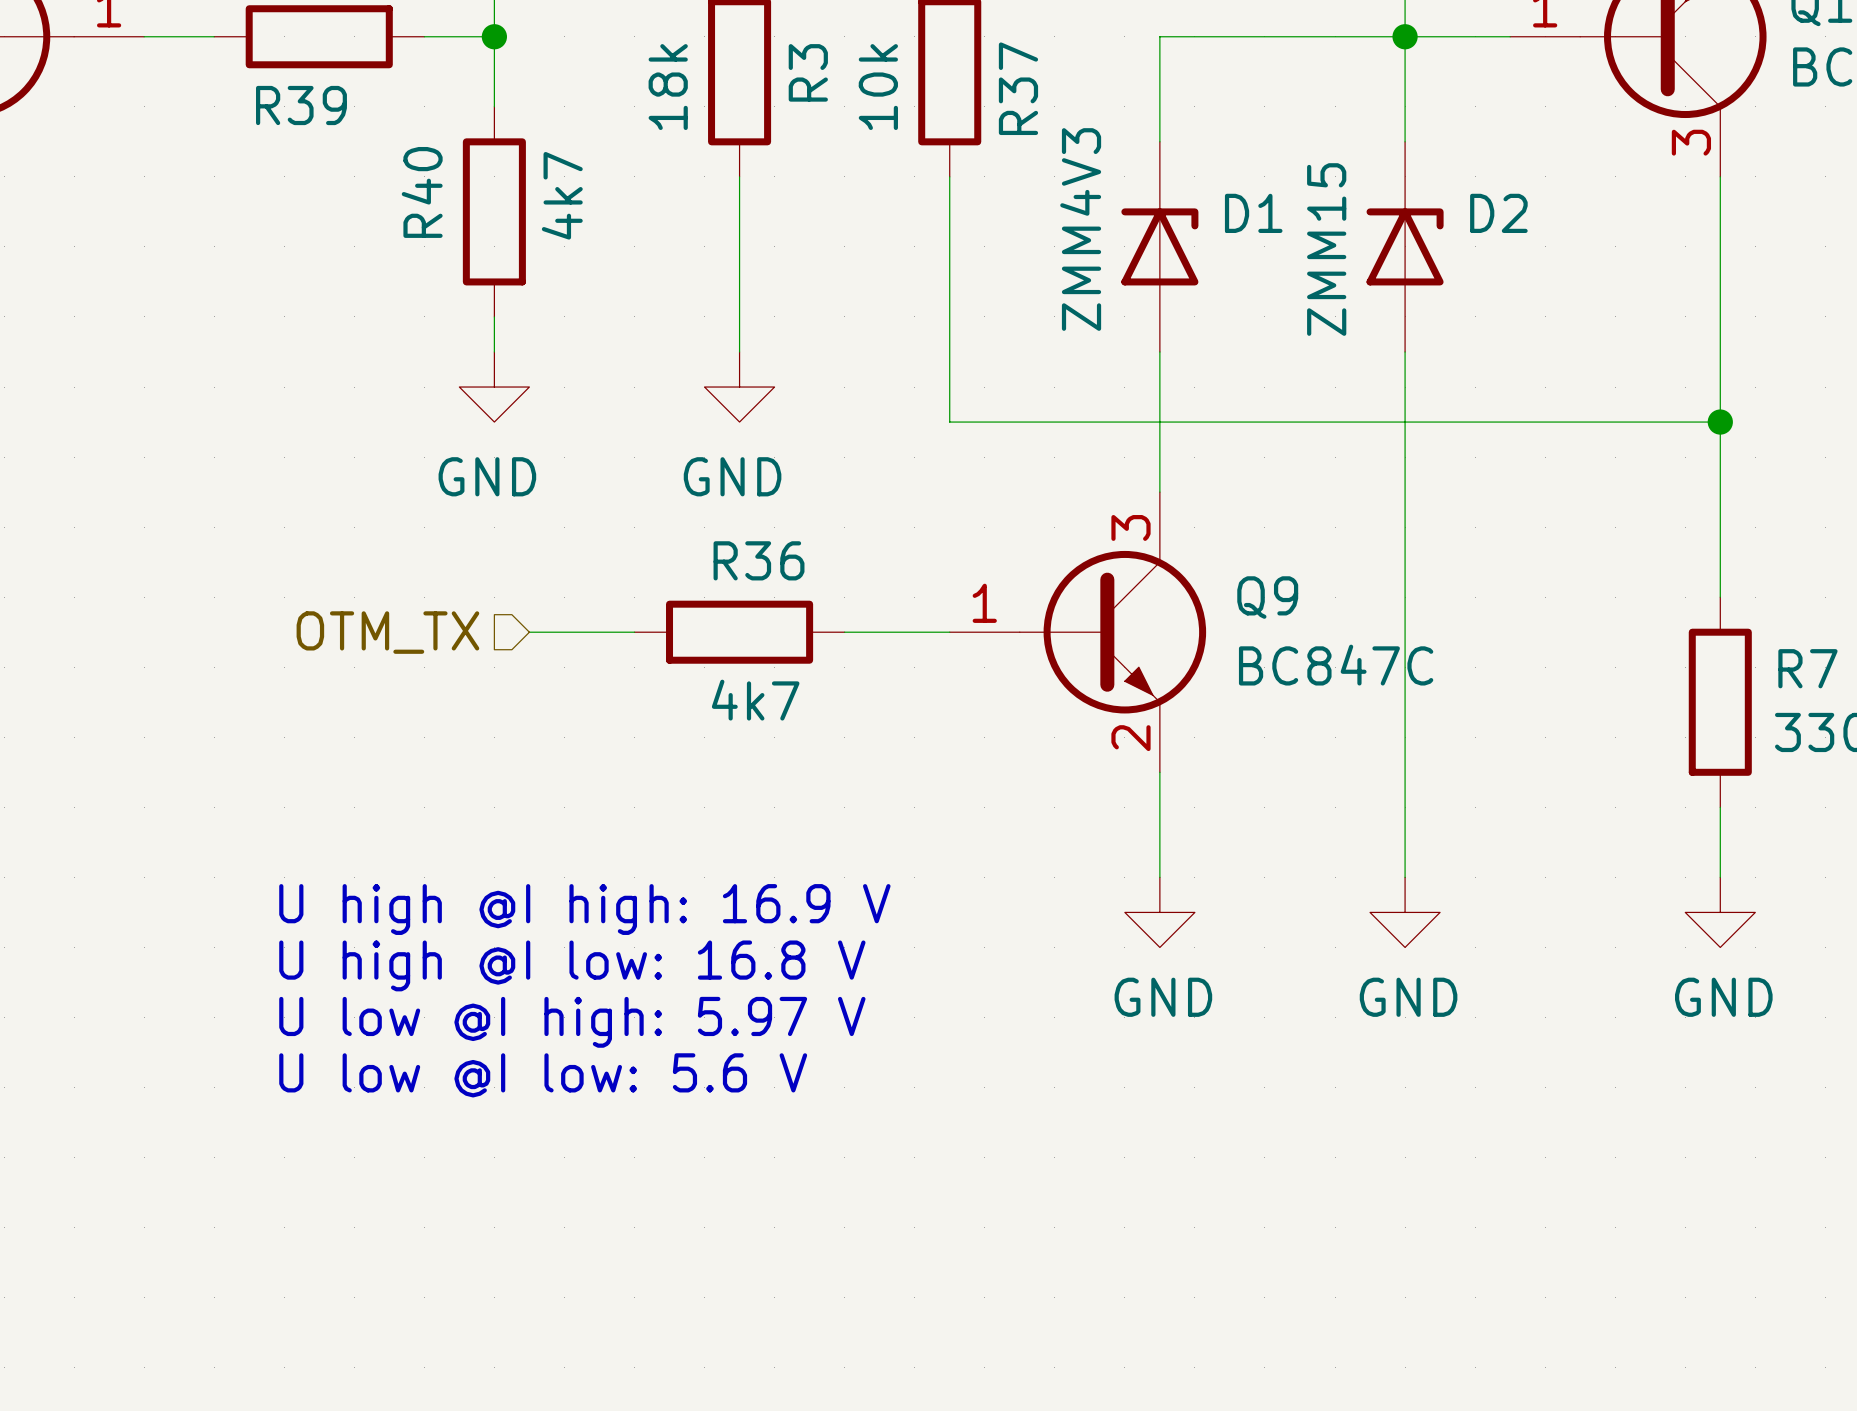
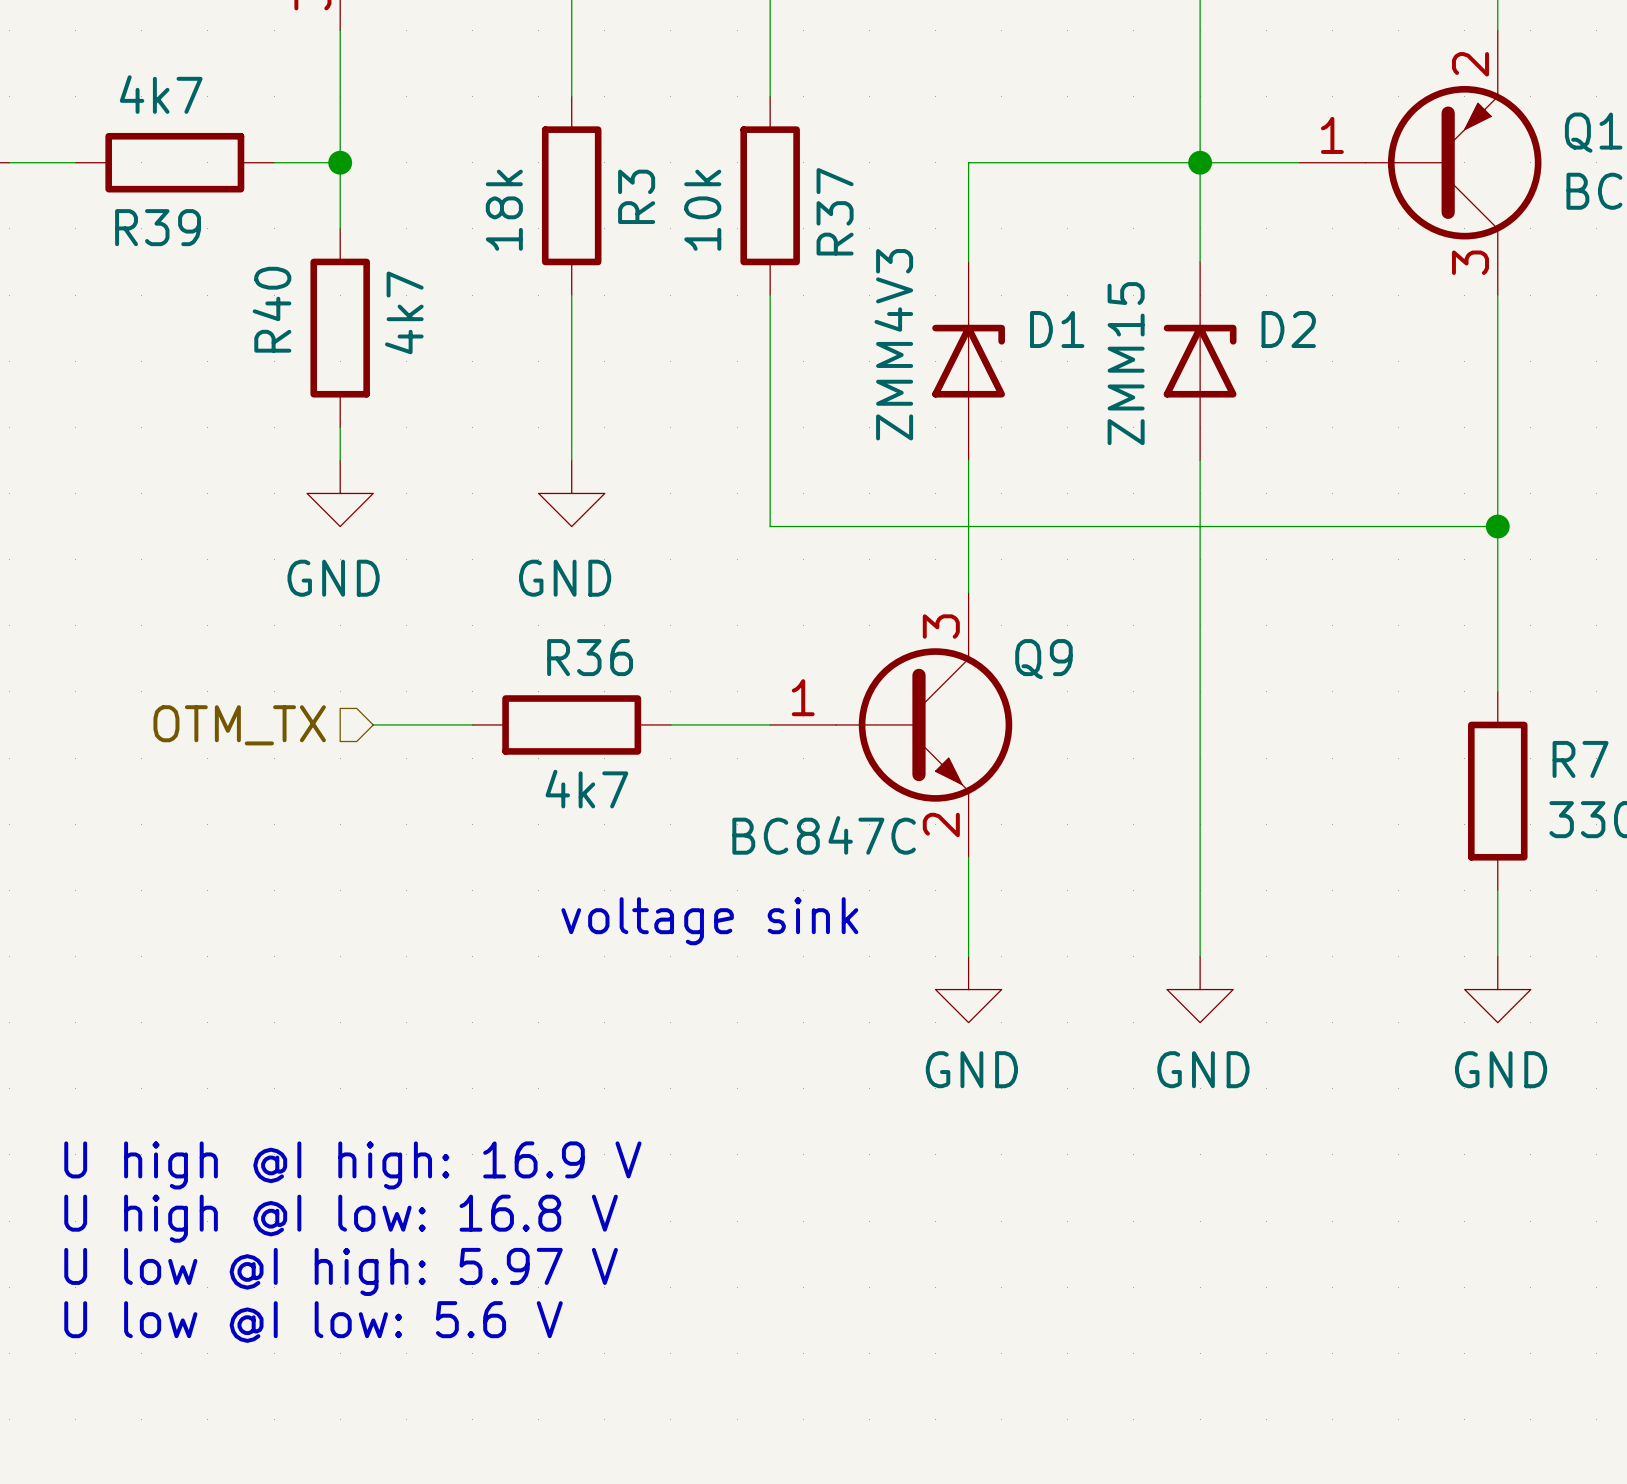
Q9 name position: Q9 (1267, 597) -> Q9 (1043, 659)
Q9 value position: BC847C (1336, 665) -> BC847C (824, 835)
text: none -> voltage sink (709, 921)
text position: U high @I high: 16.9 V (584, 909) -> U high @I high: 16.9 V (352, 1165)
text position: U high @I low: 16.8 V (572, 965) -> U high @I low: 16.8 V (341, 1218)
text position: U low @I high: 5.97 V (572, 1022) -> U low @I high: 5.97 V (341, 1271)
text position: U low @I low: 5.6 V (543, 1075) -> U low @I low: 5.6 V (313, 1322)

